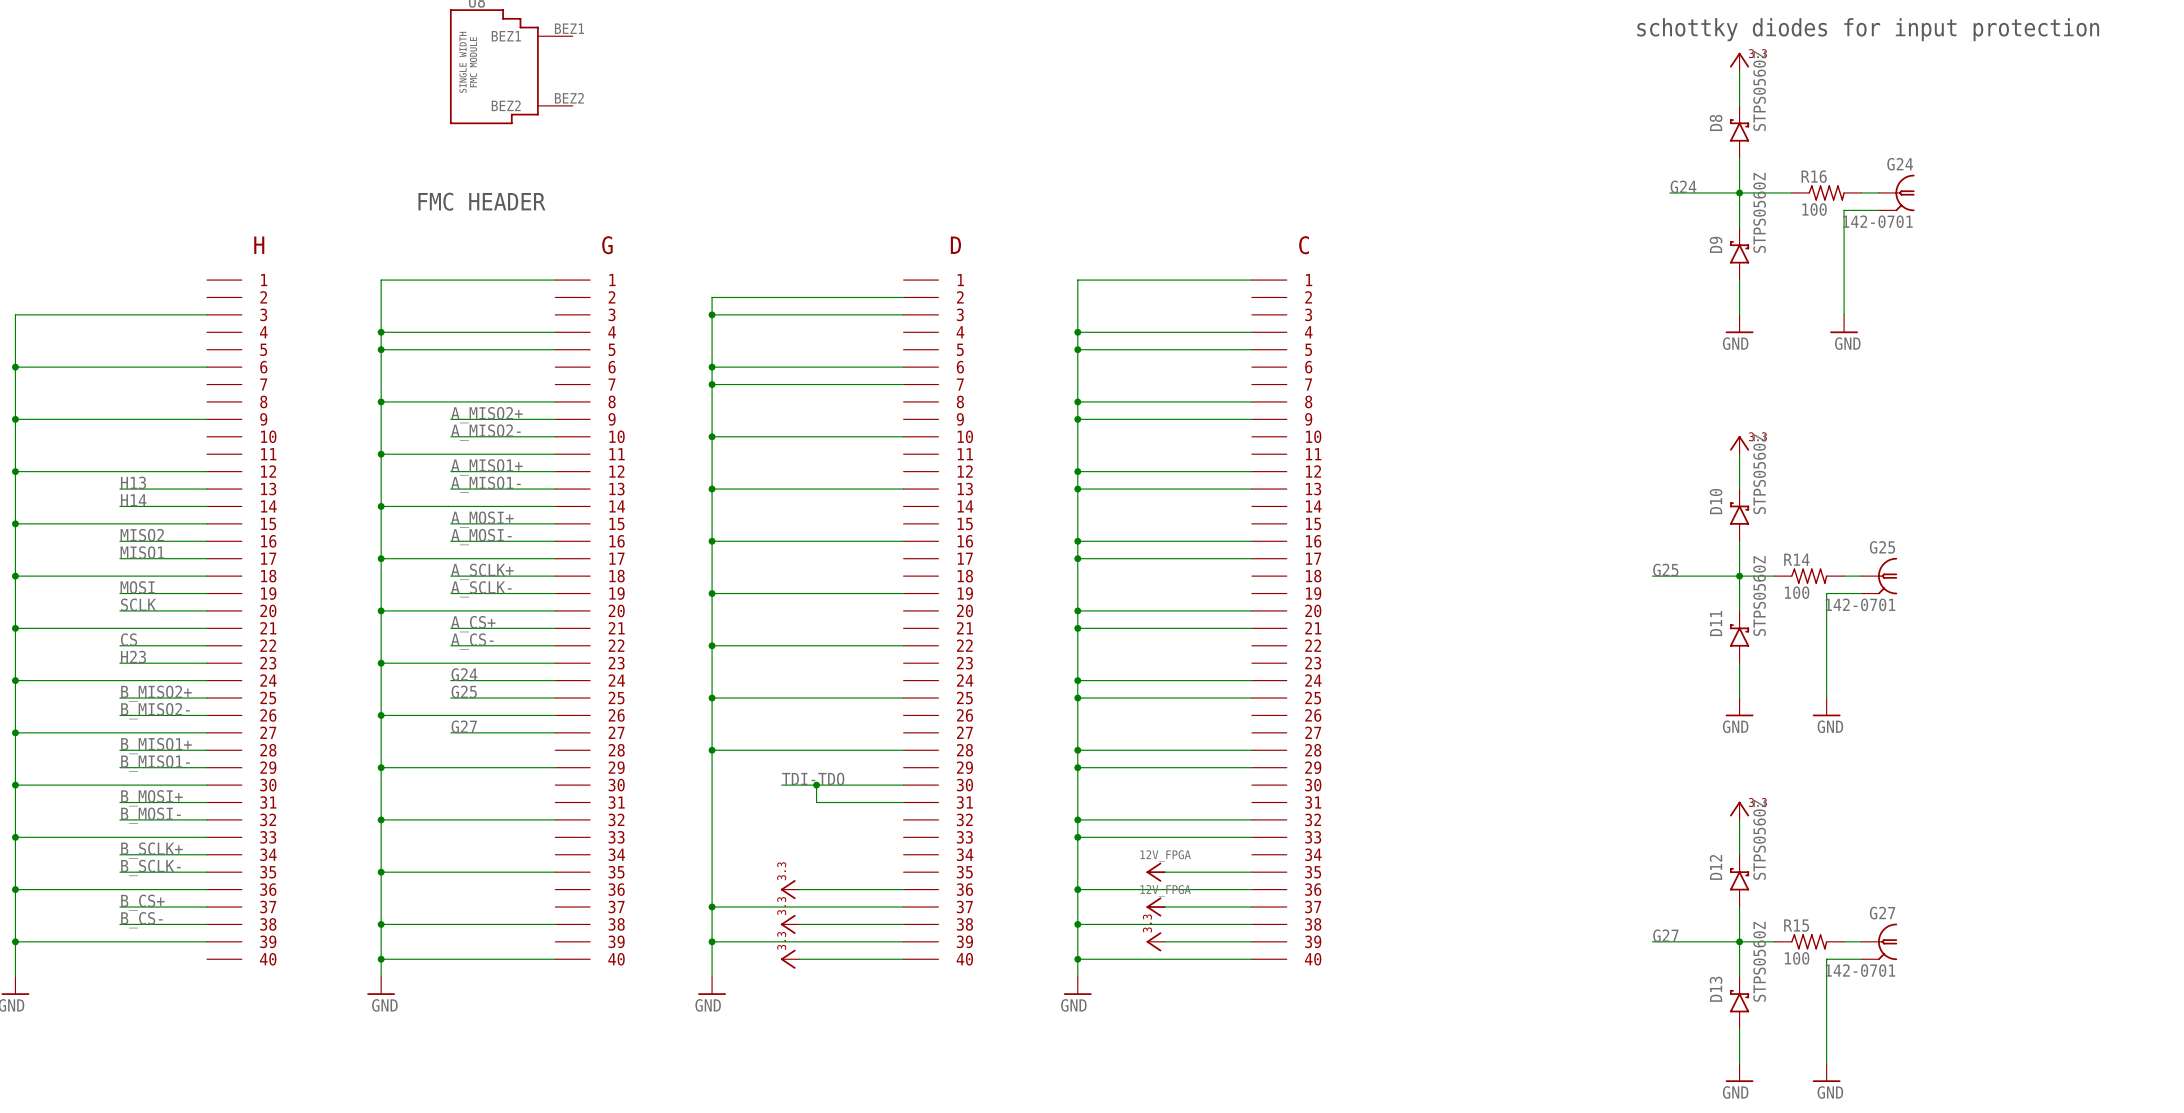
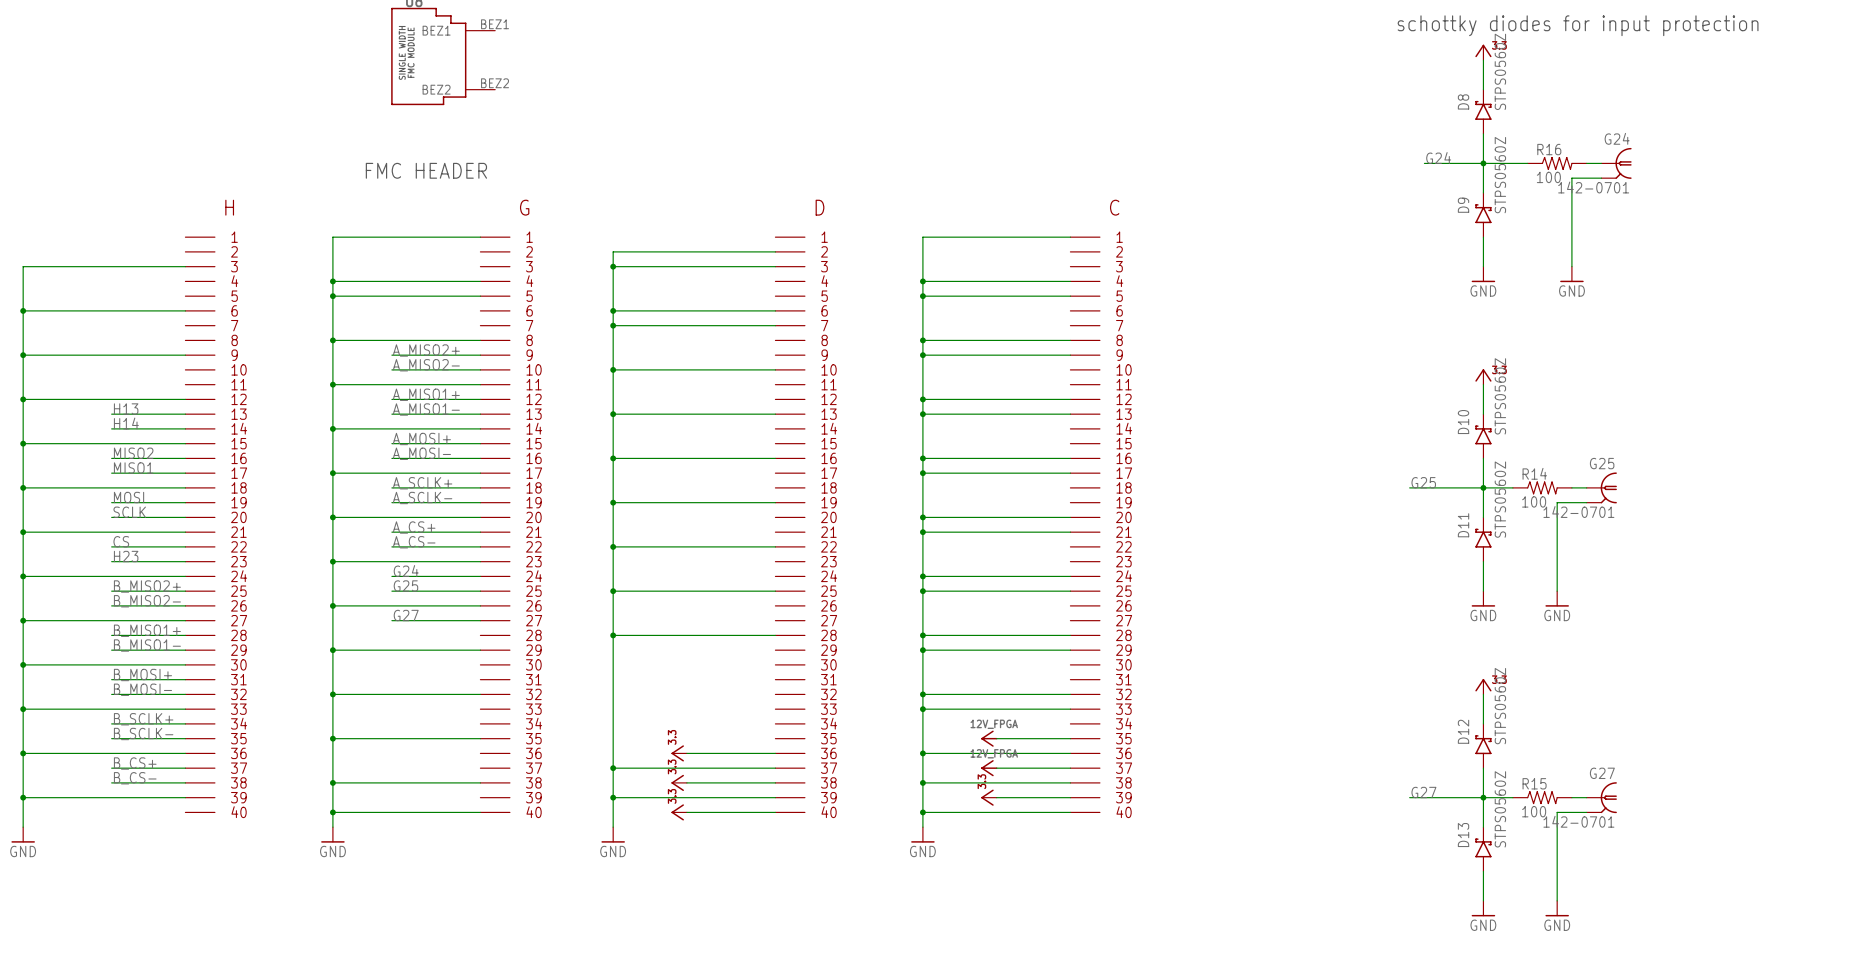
label: TDI-TDO (813, 779) -> none
wire: (781, 785) (903, 785) -> none
wire: (816, 785) (816, 802) (903, 802) -> none
junction: (816, 785) -> none

